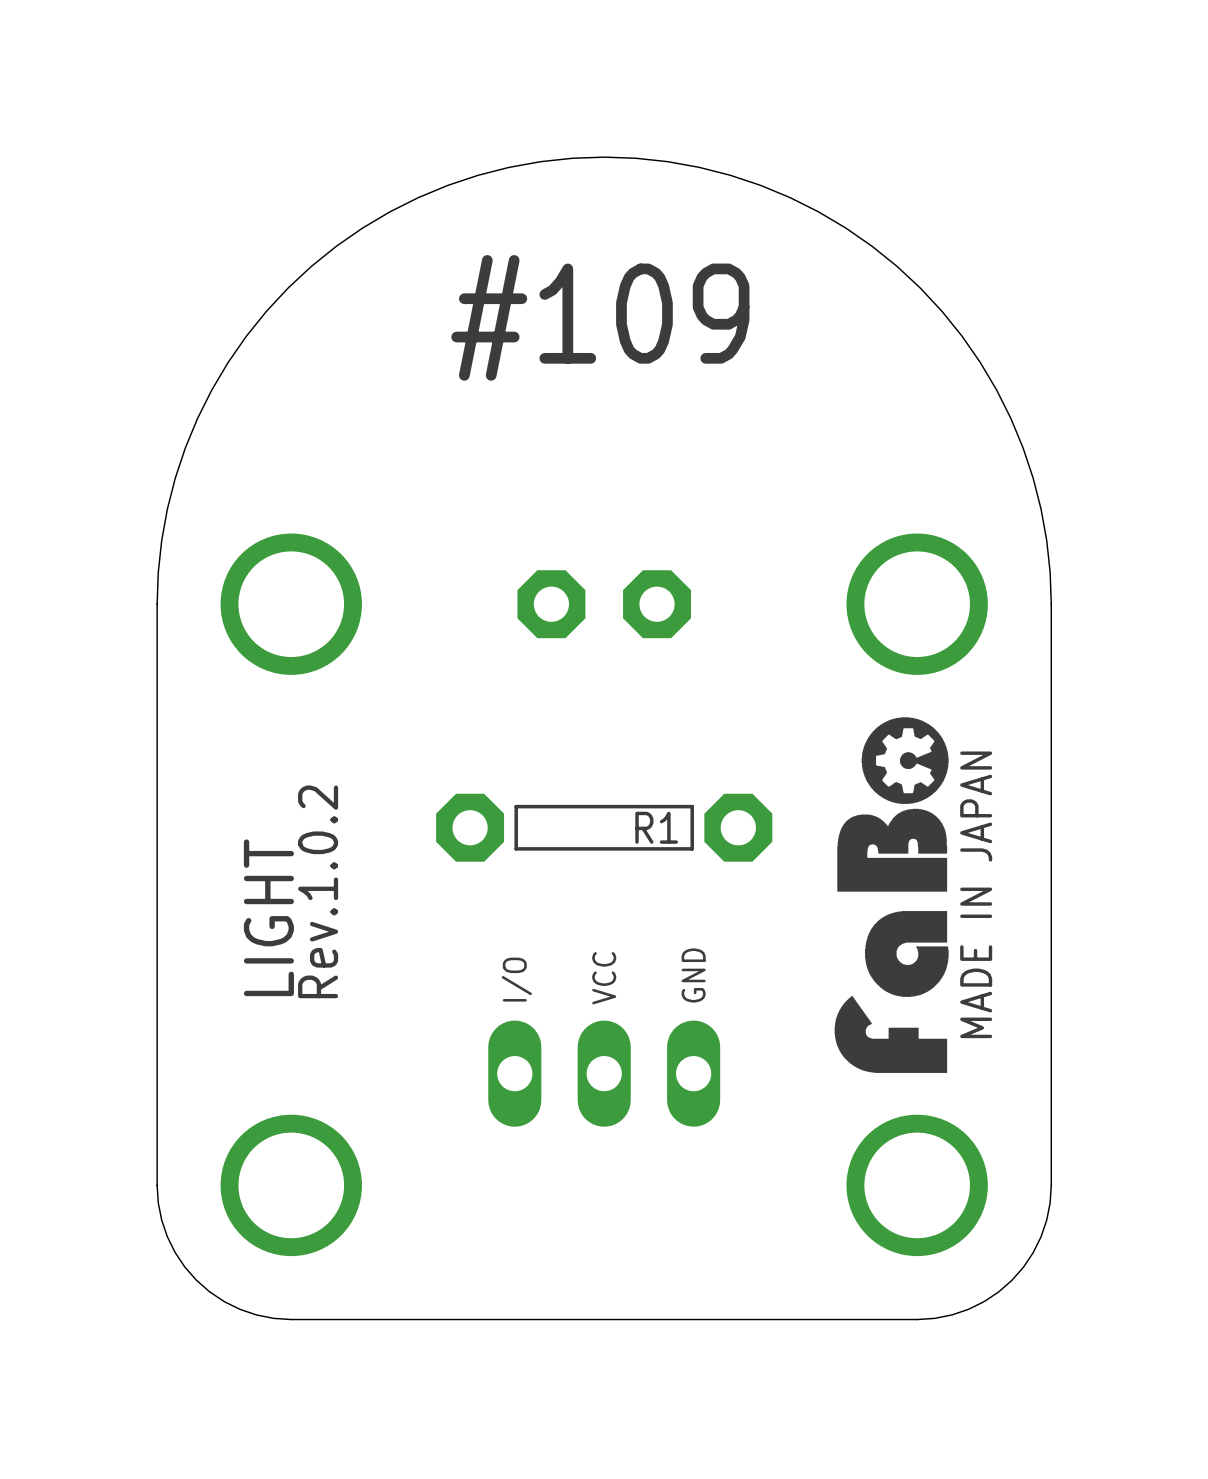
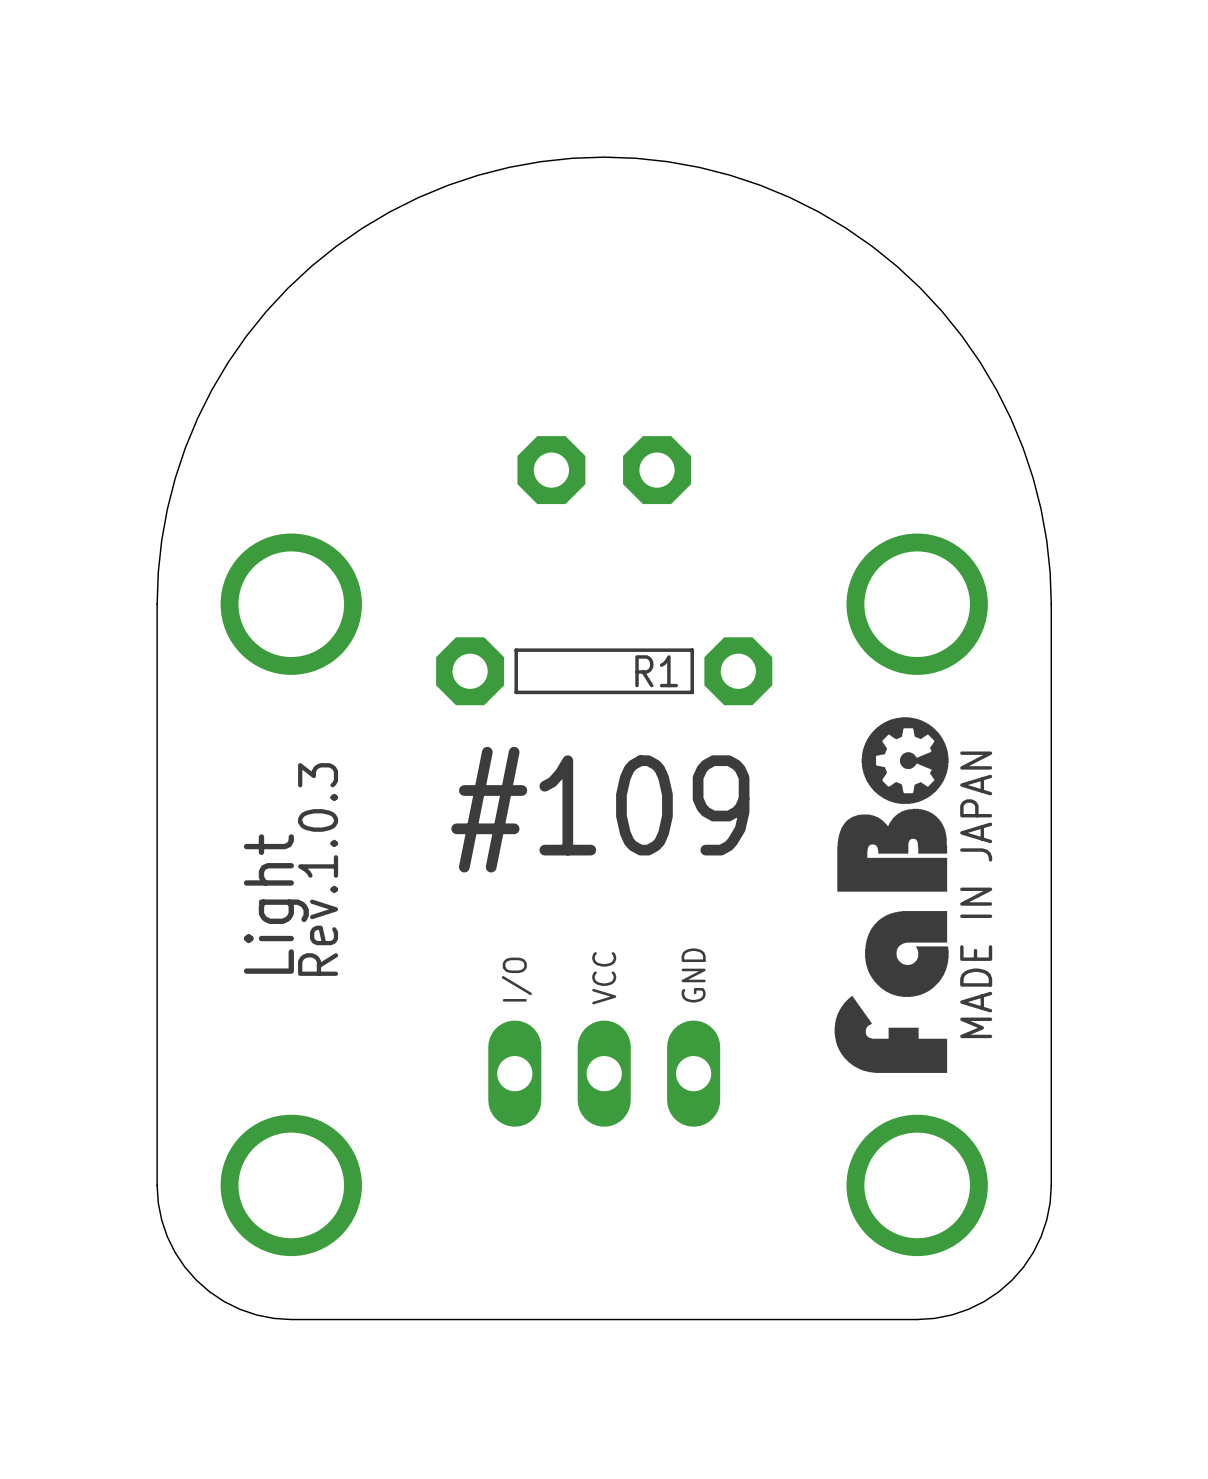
text position: #109 (600, 317) -> #109 (600, 809)
part position: (604, 604) -> (604, 470)
R1 position: (604, 827) -> (604, 671)
text: Rev.1.0.2 (318, 891) -> Rev.1.0.3 (318, 869)
text: LIGHT (268, 917) -> Light (276, 904)

